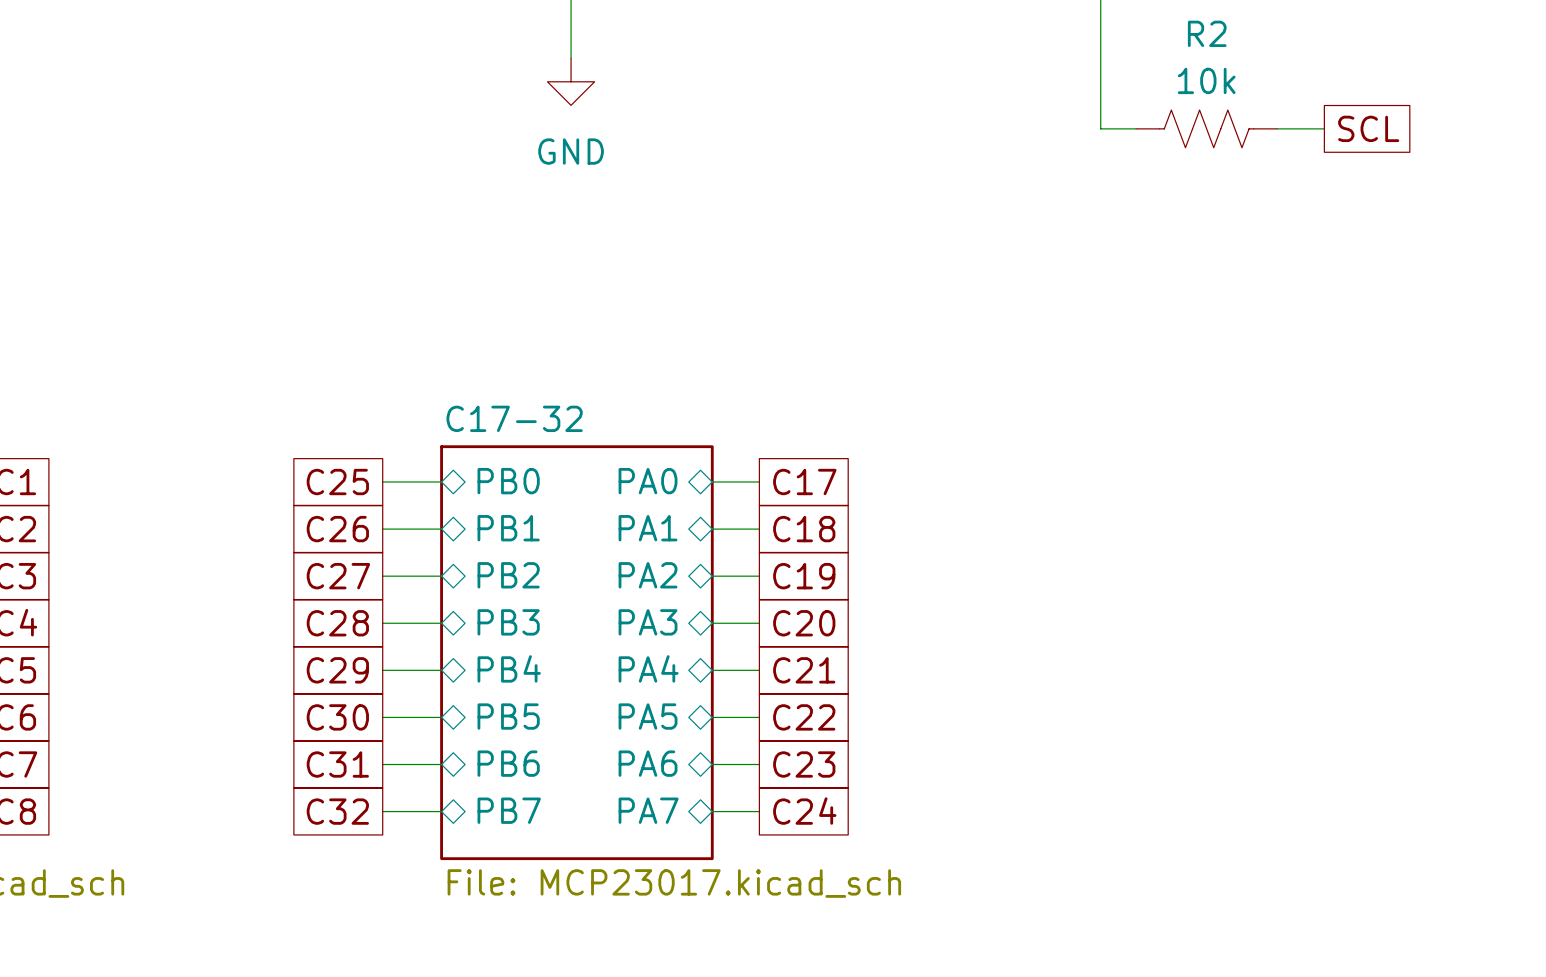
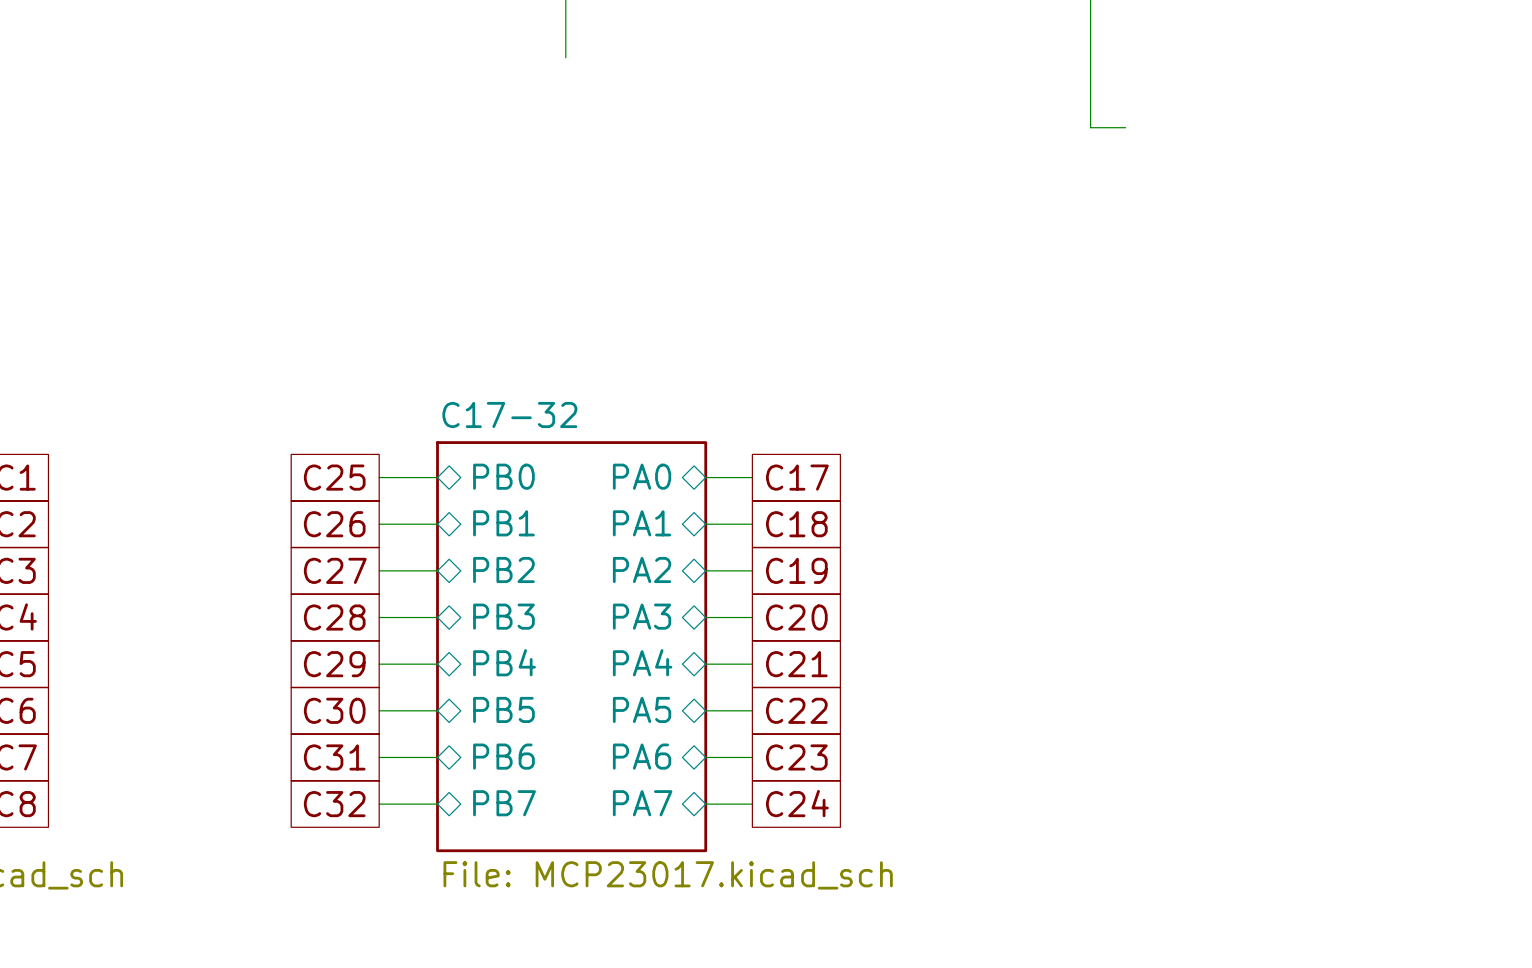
power symbol: GND (571, 81) -> none
R2: 10k (1206, 128) -> none
wire: (1277, 128) (1324, 128) -> none
global label: SCL (1368, 128) -> none

